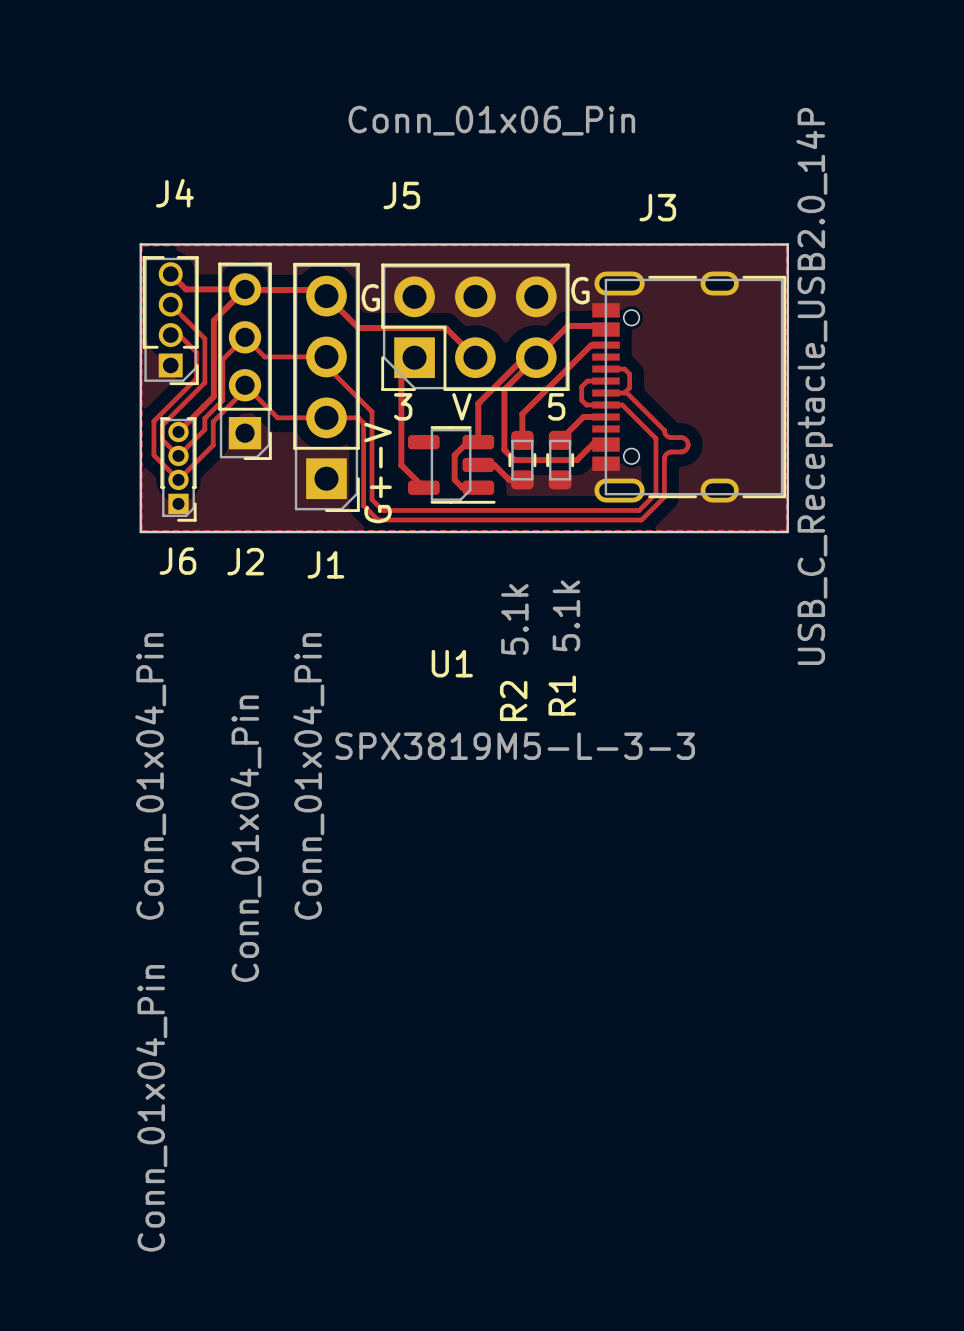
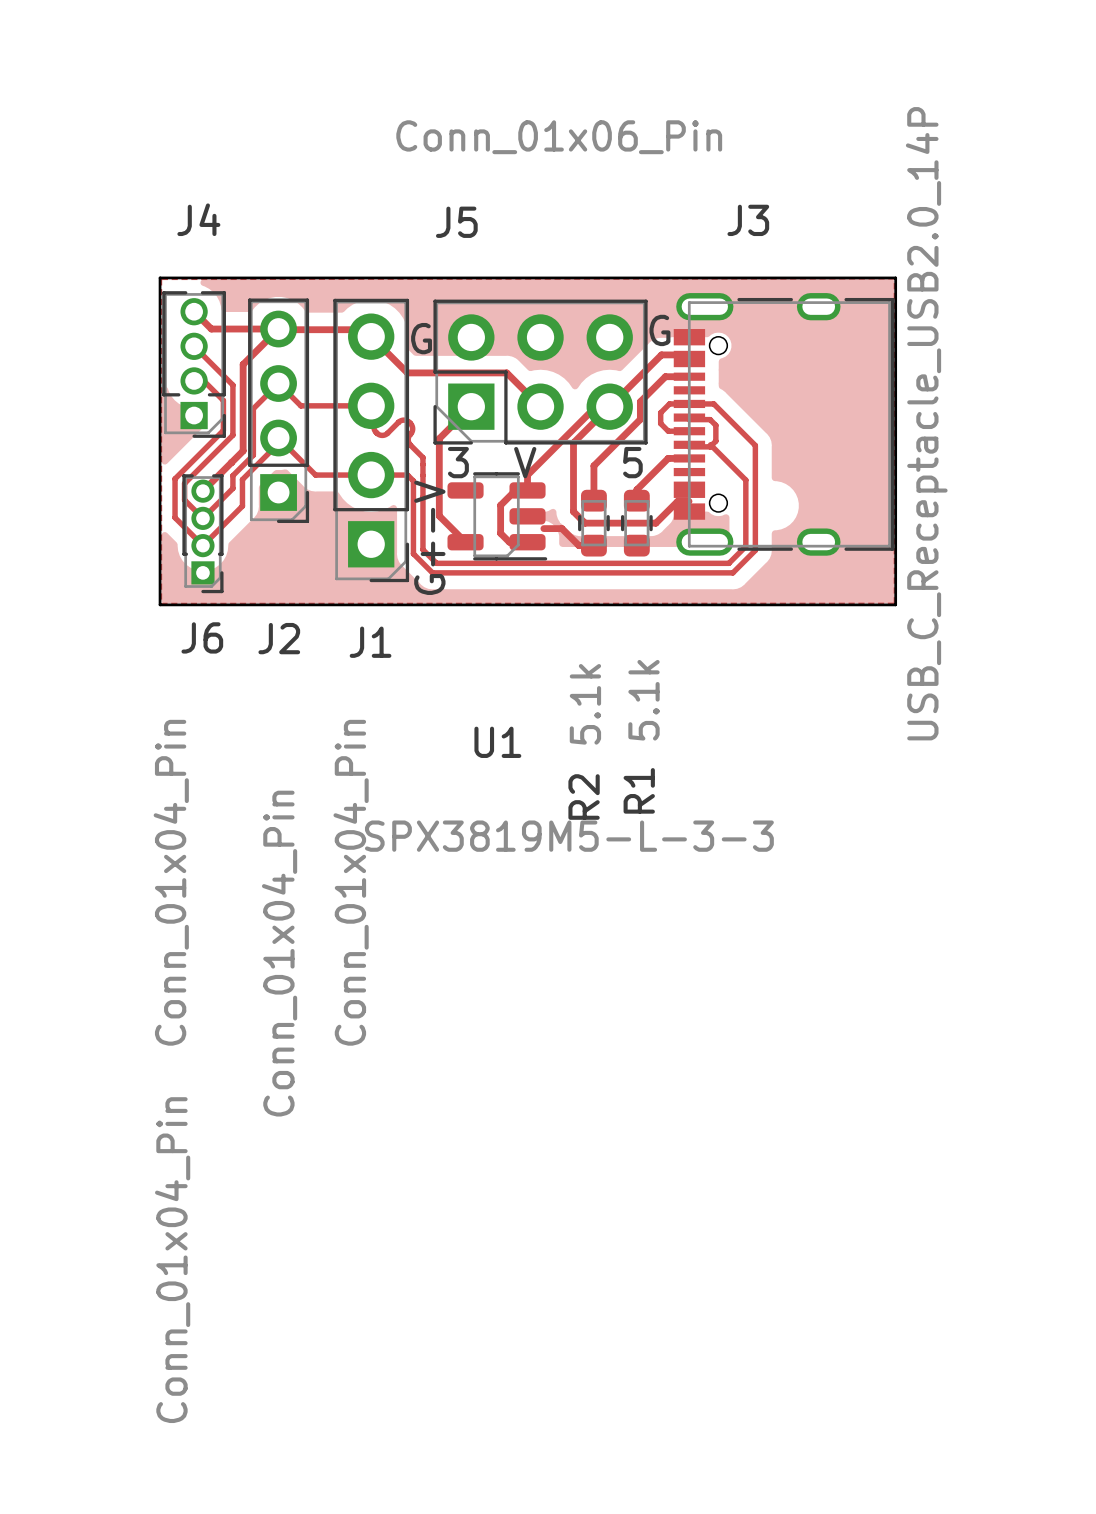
track: (568, 325) (606, 325) -> (645, 370) (661, 354) (689, 354)
track: (606, 345) (591, 345) (522, 414) -> (689, 376) (665, 376) (640, 401) (640, 419) (593, 465) (593, 470)
track: (326, 356) (326, 366) (372, 411) -> (371, 405) (378, 414) (373, 427) (379, 434) (386, 434) (401, 420) (406, 420) (411, 424) (412, 429) (408, 441) (422, 457) (422, 468)
track: (401, 370) (401, 465) (423, 487) -> (456, 421) (439, 438) (439, 516) (465, 542)
track: none -> (689, 431) (668, 431) (660, 423) (660, 412) (669, 403) (713, 403) (755, 445) (755, 522)
track: (606, 381) (587, 381) (581, 386) (581, 400) (586, 405) (622, 405) (655, 438) -> none
J3 position: (689, 387) -> (783, 424)
track: (478, 403) (478, 442) (467, 442) (454, 455) (454, 479) (462, 487) (478, 487) -> (543, 458) (527, 475) (527, 490) (515, 490) (500, 505) (500, 533) (509, 542) (527, 542)
track: (606, 416) (583, 416) (560, 440) -> (689, 458) (668, 458) (636, 489) (636, 500)
track: (655, 422) (667, 436) (682, 437) (687, 442) (685, 450) (668, 452) (664, 459) -> (745, 480) (745, 498)
U1 position: (451, 464) -> (497, 516)
track: (655, 480) (655, 493) (639, 510) (382, 510) (372, 499) (372, 483) -> (745, 546) (728, 563) (436, 563) (422, 549)
track: (664, 484) (664, 497) (641, 520) (378, 520) (363, 505) (363, 487) -> (755, 550) (732, 572) (432, 572) (413, 553)

